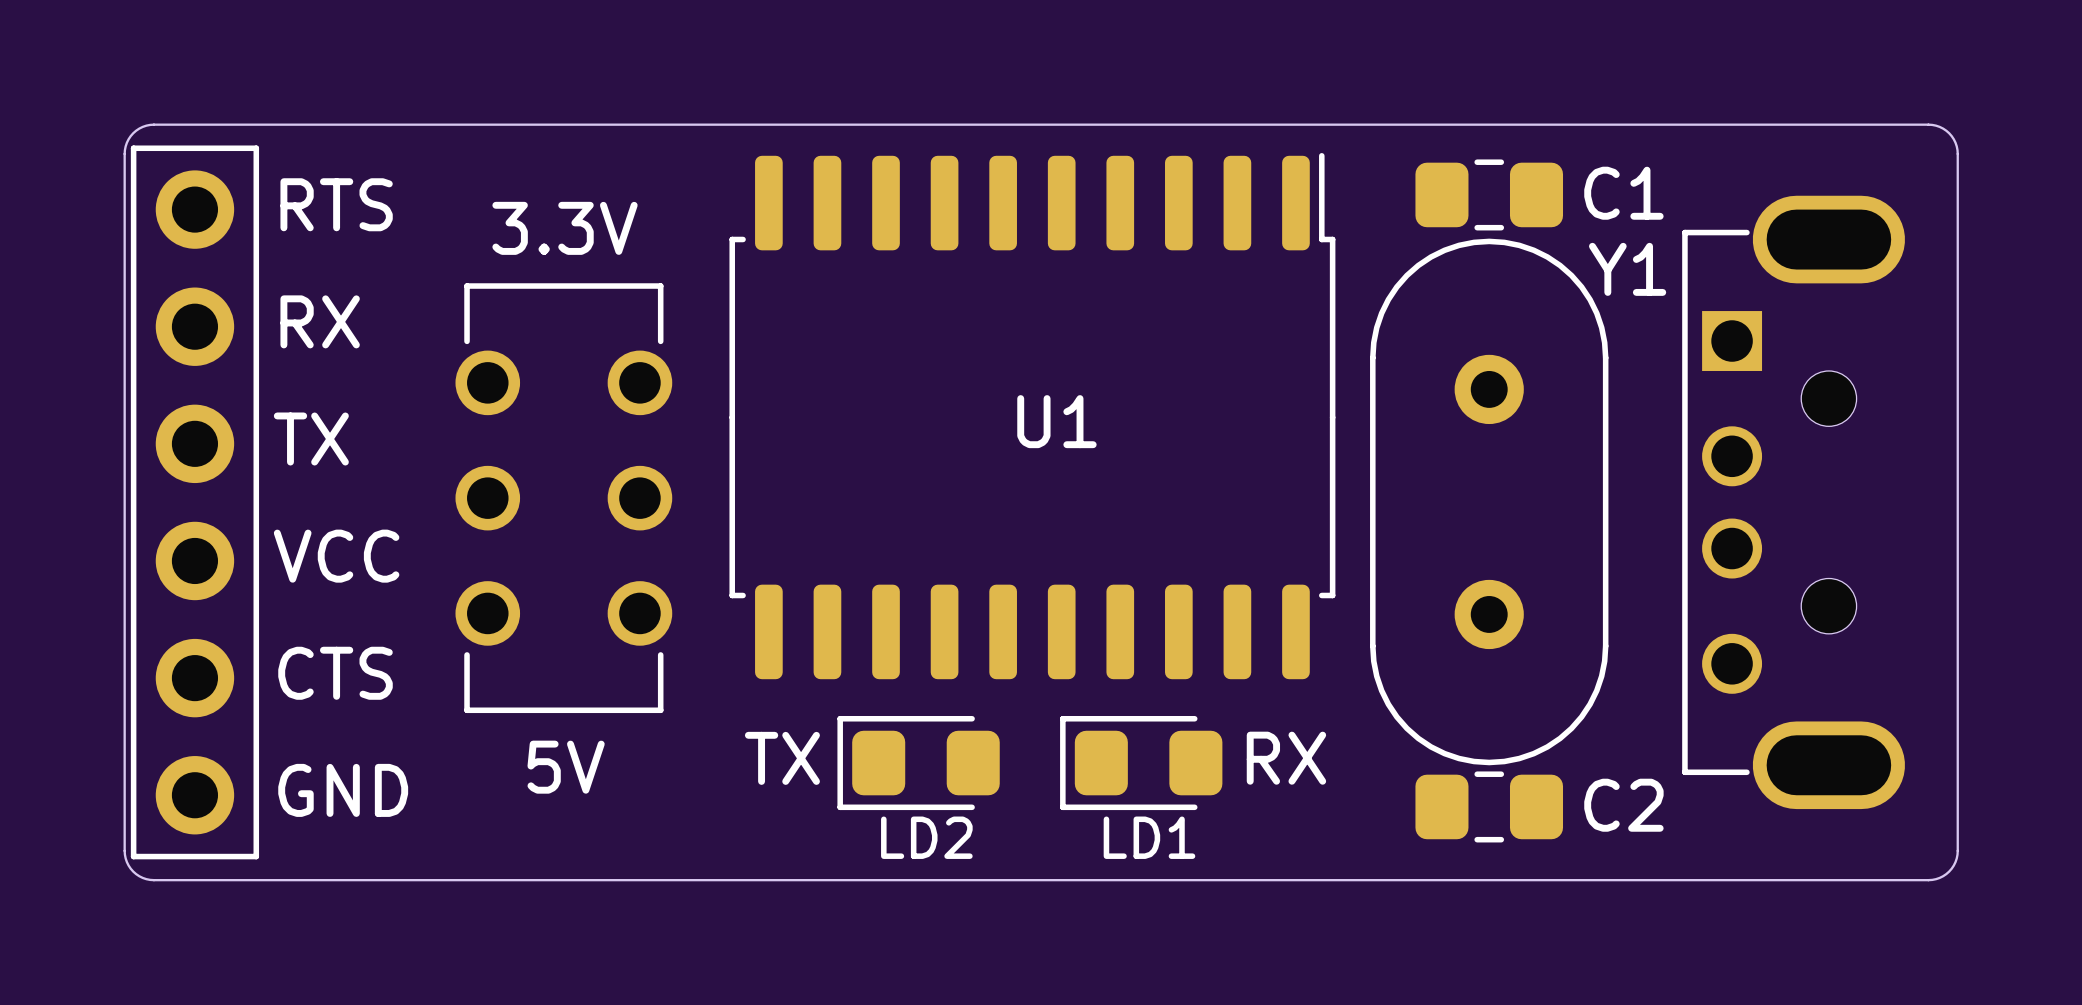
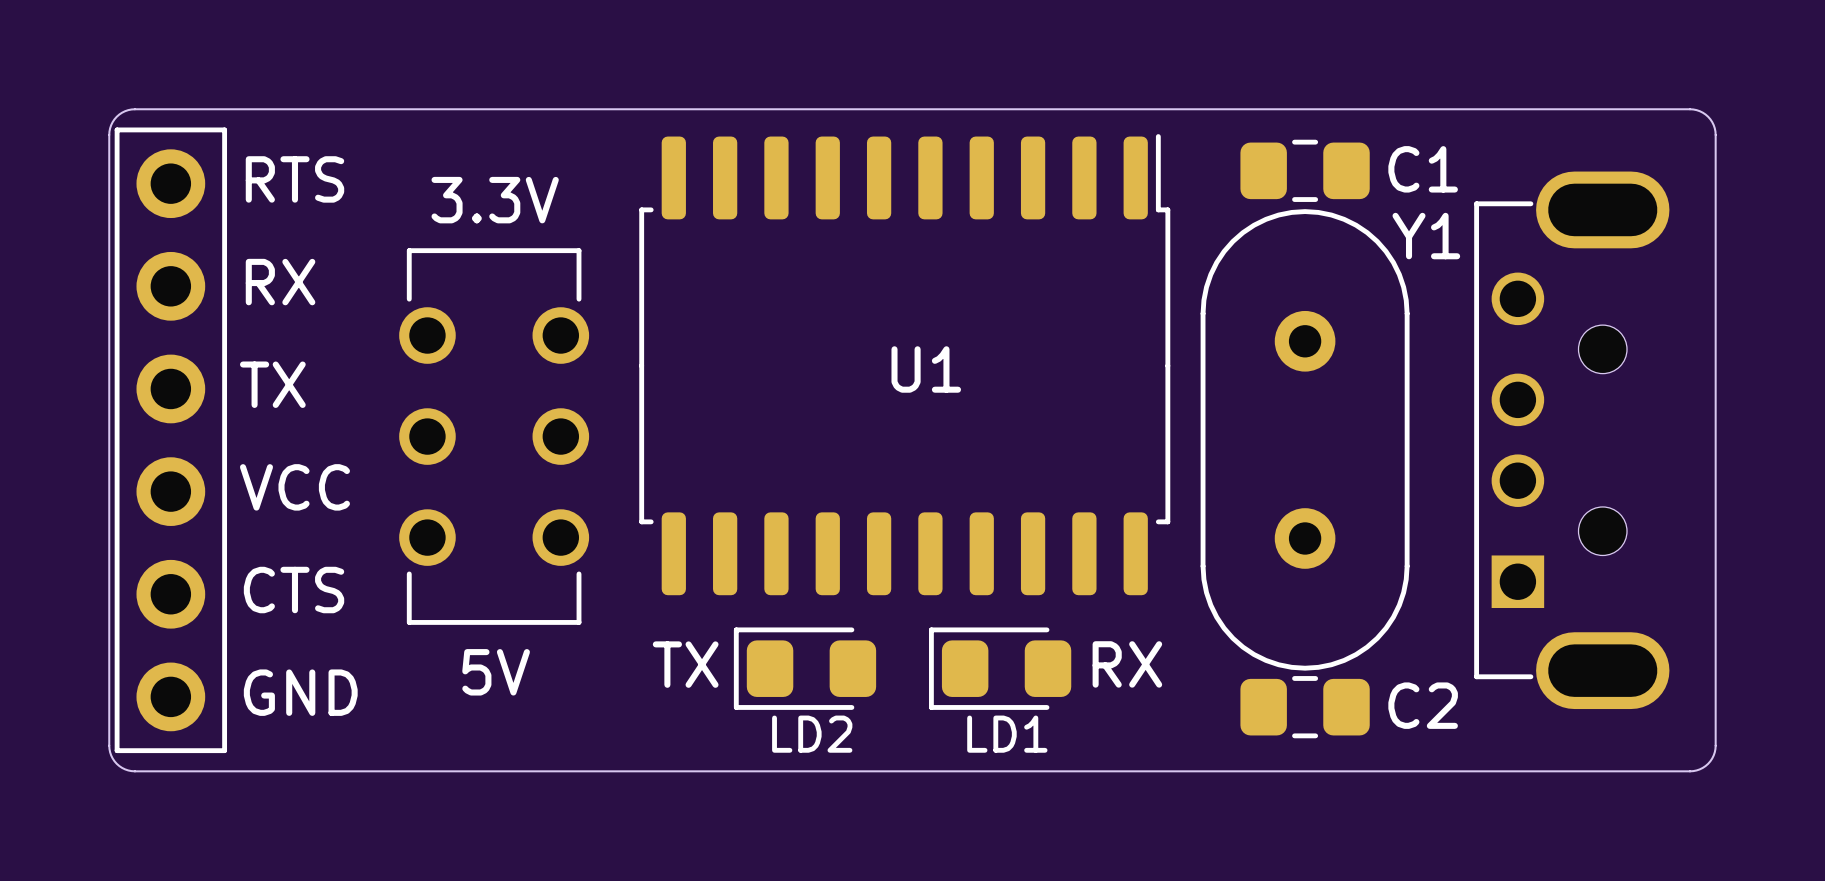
part footprint: [1682, 195, 1905, 810] -> [1474, 171, 1670, 710]

